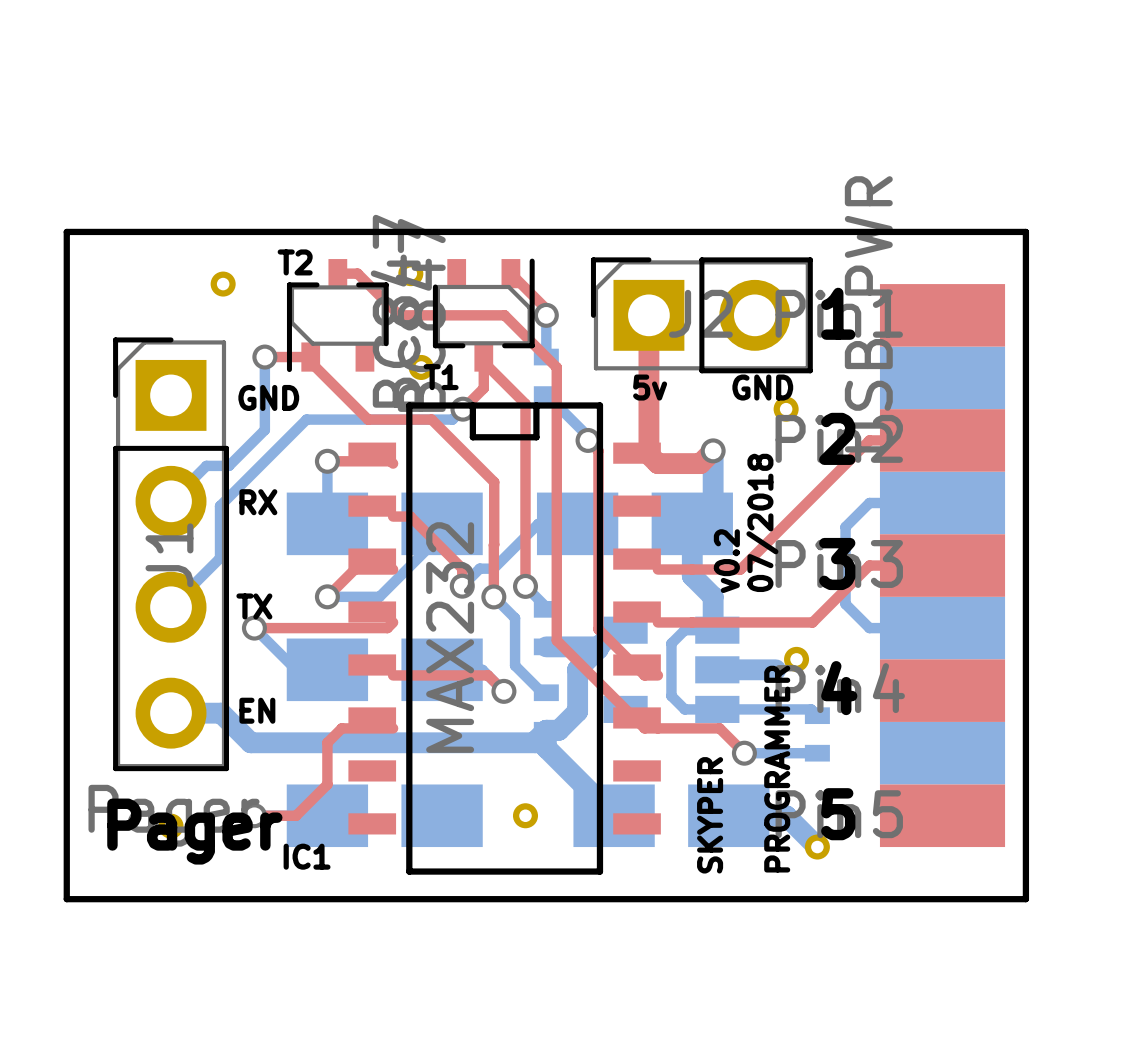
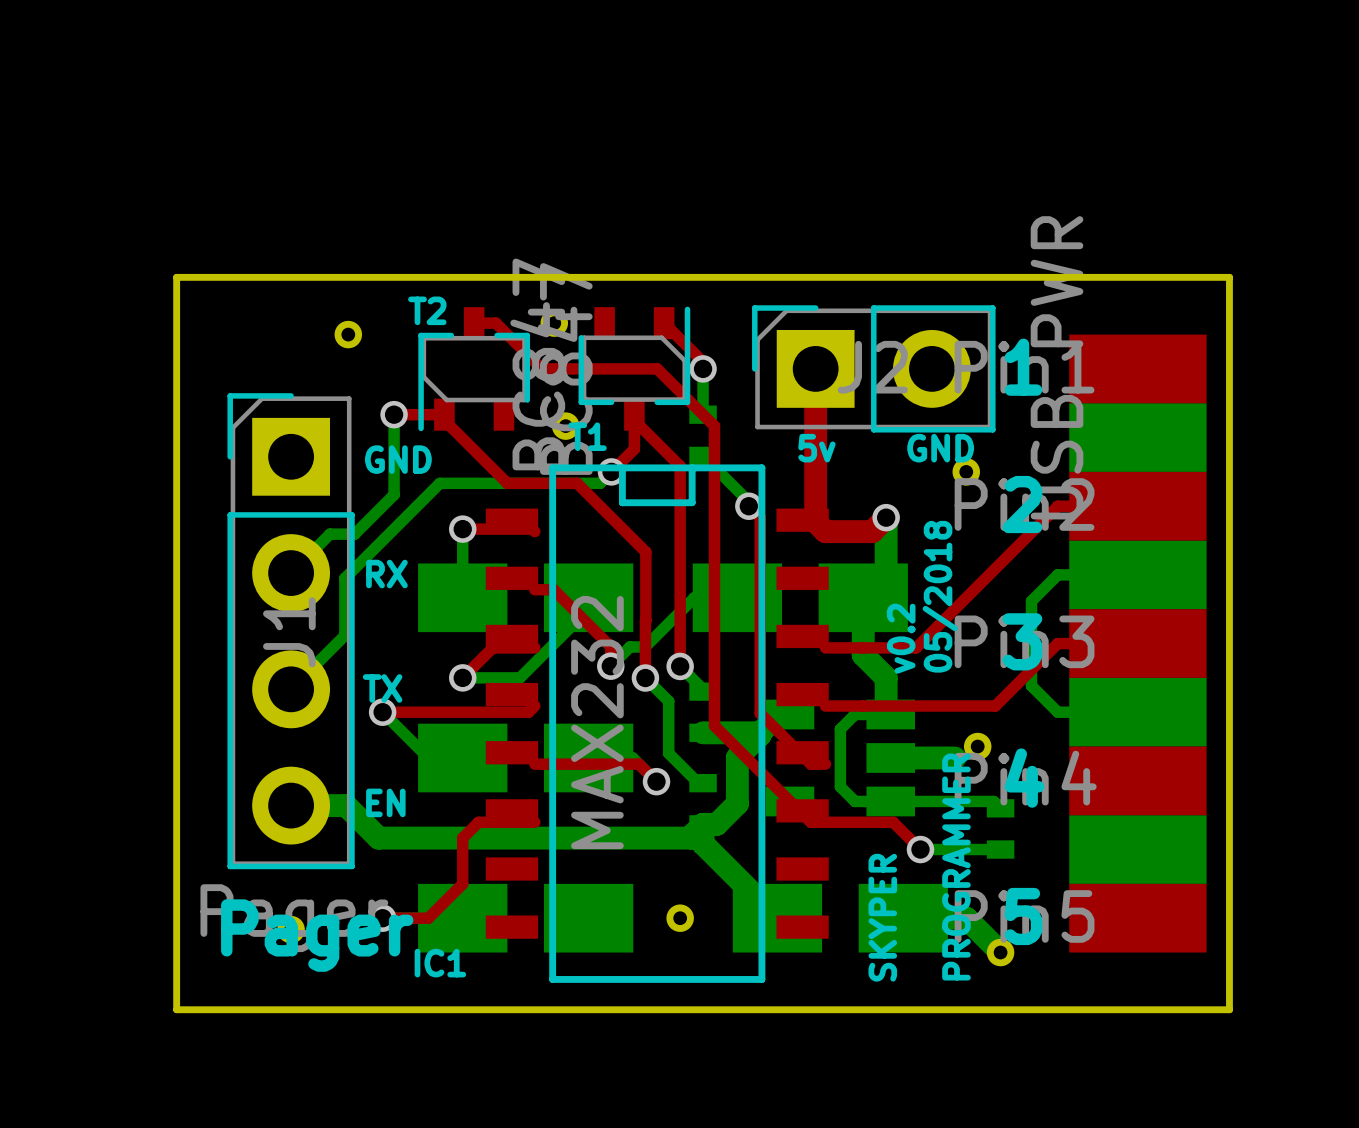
text: 07/2018 (762, 522) -> 05/2018 (940, 596)

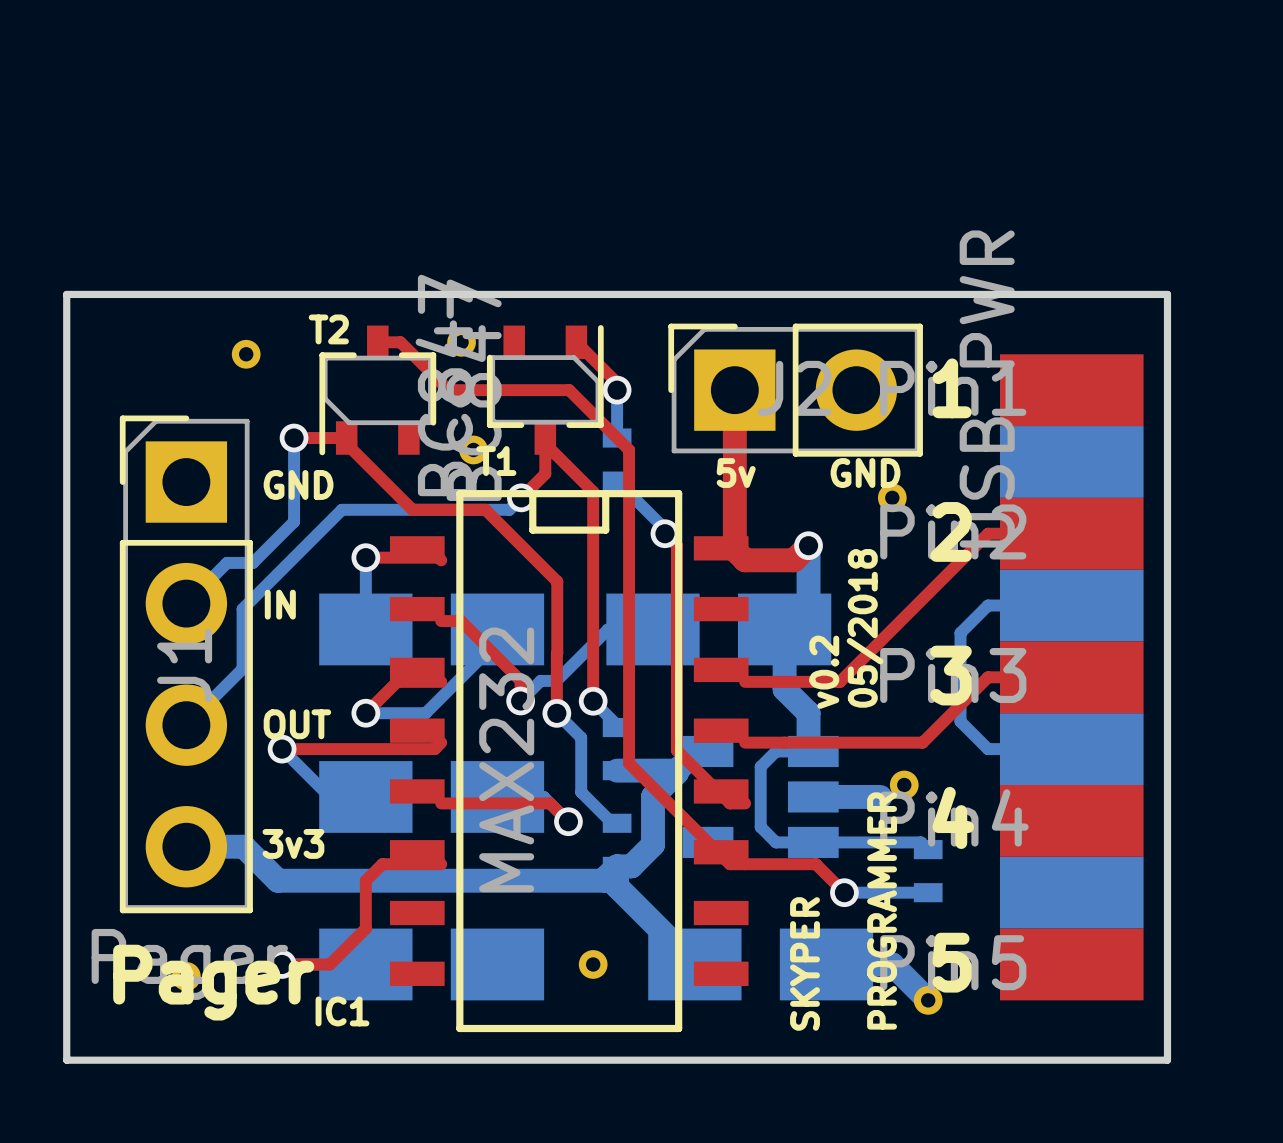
text: RX (386, 574) -> IN (280, 604)
text: TX (382, 688) -> OUT (297, 724)
text: EN (385, 802) -> 3v3 (293, 843)

